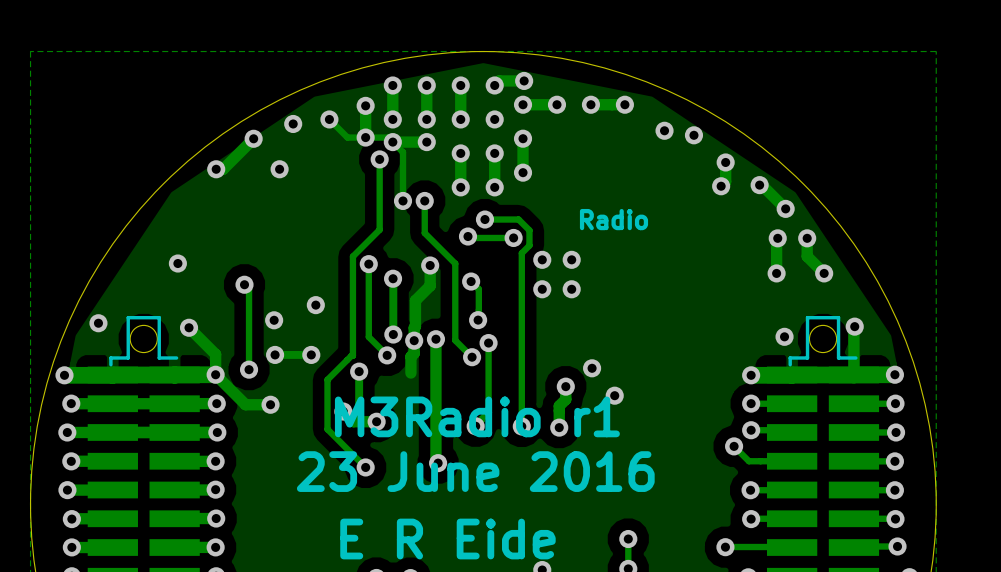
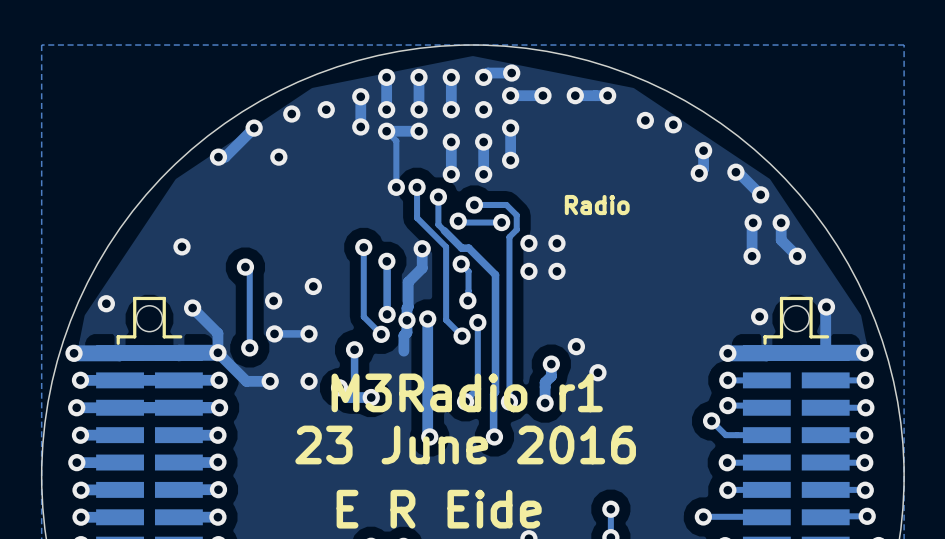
track: (329, 119) (347, 137) (388, 137) (392, 142) -> none
track: (379, 159) (379, 229) (352, 256) (352, 355) (327, 379) (327, 429) (365, 467) -> none
via position: (379, 159) -> (438, 197)
track: none -> (438, 197) (438, 224) (461, 248) (468, 248) (495, 274) (494, 436)
via: none -> (309, 381)
via: none -> (494, 436)
via: (365, 467) -> none

